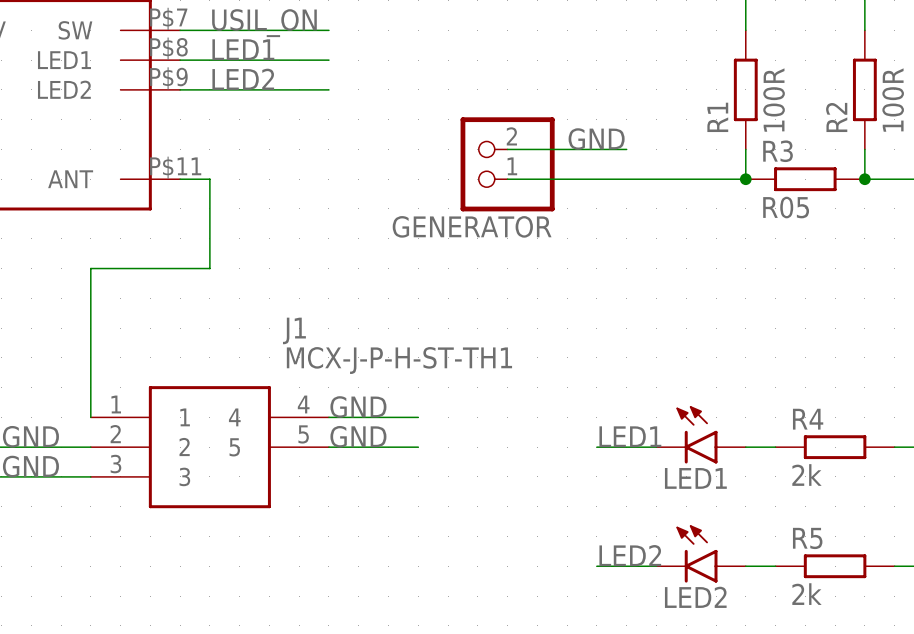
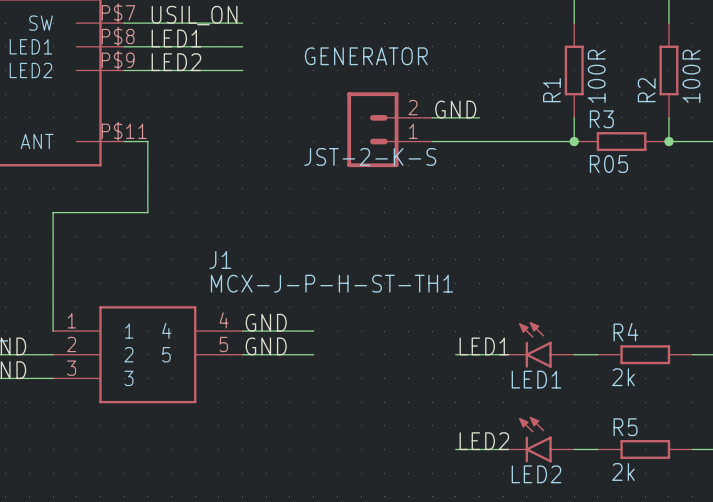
GENERATOR symbol: [460, 117, 555, 212] -> [347, 92, 433, 168]
GENERATOR value: none -> JST-2-K-S (370, 156)
GENERATOR name position: GENERATOR (472, 226) -> GENERATOR (366, 56)

